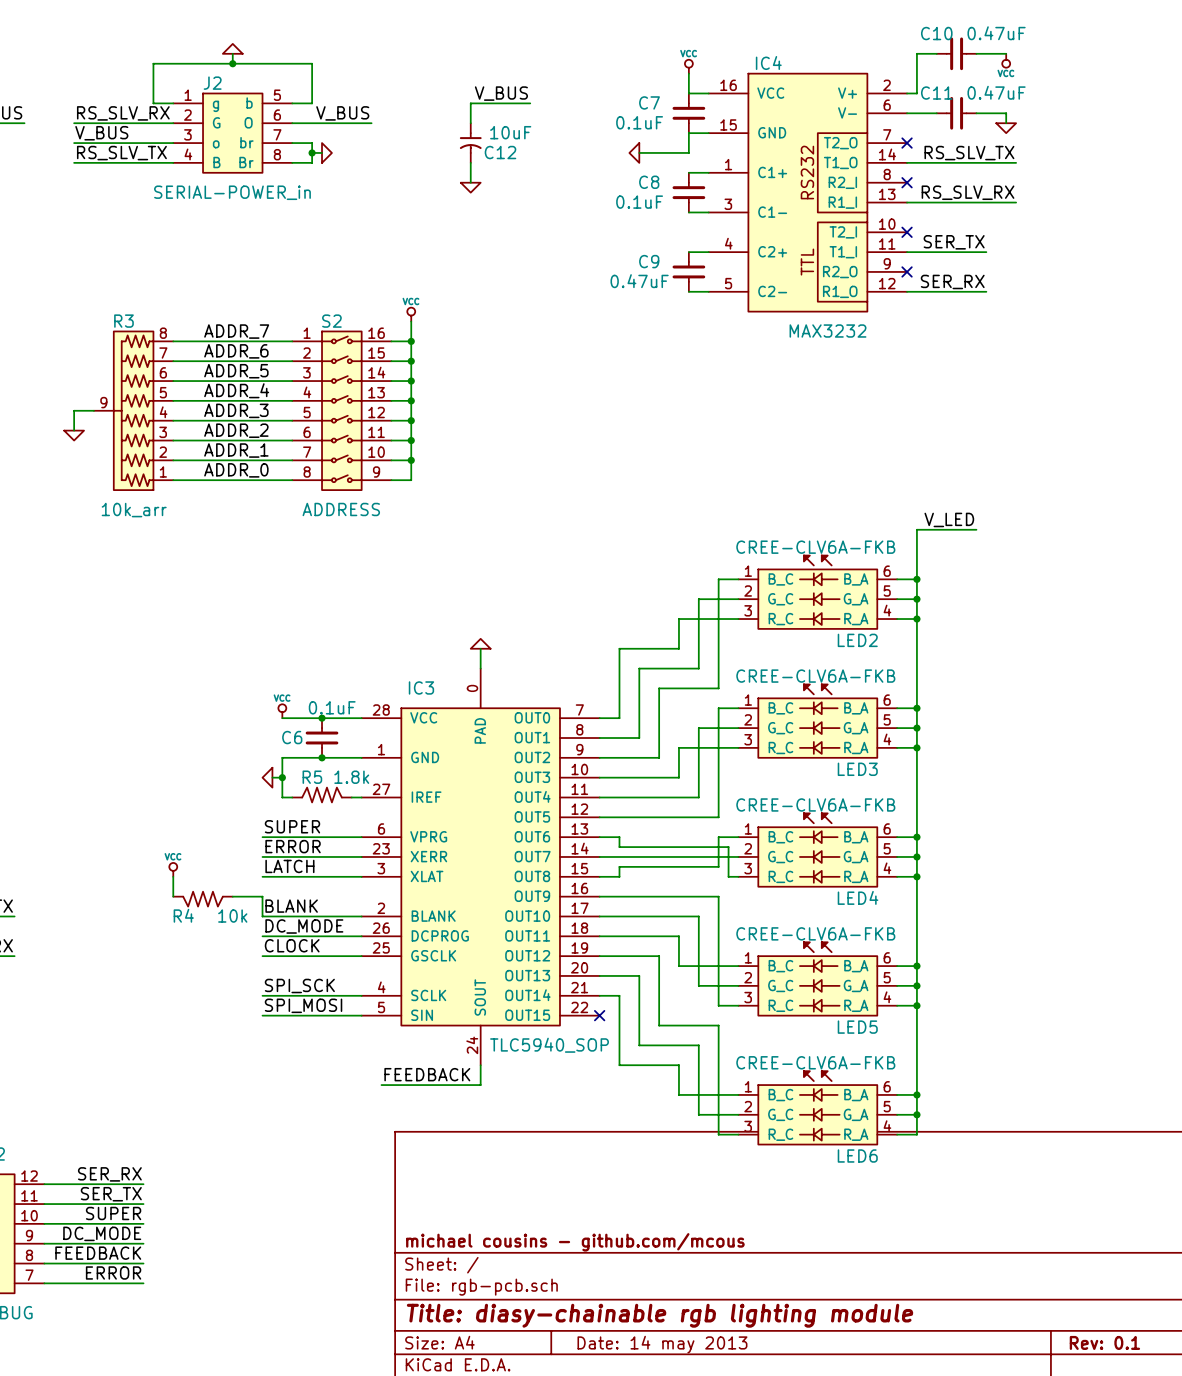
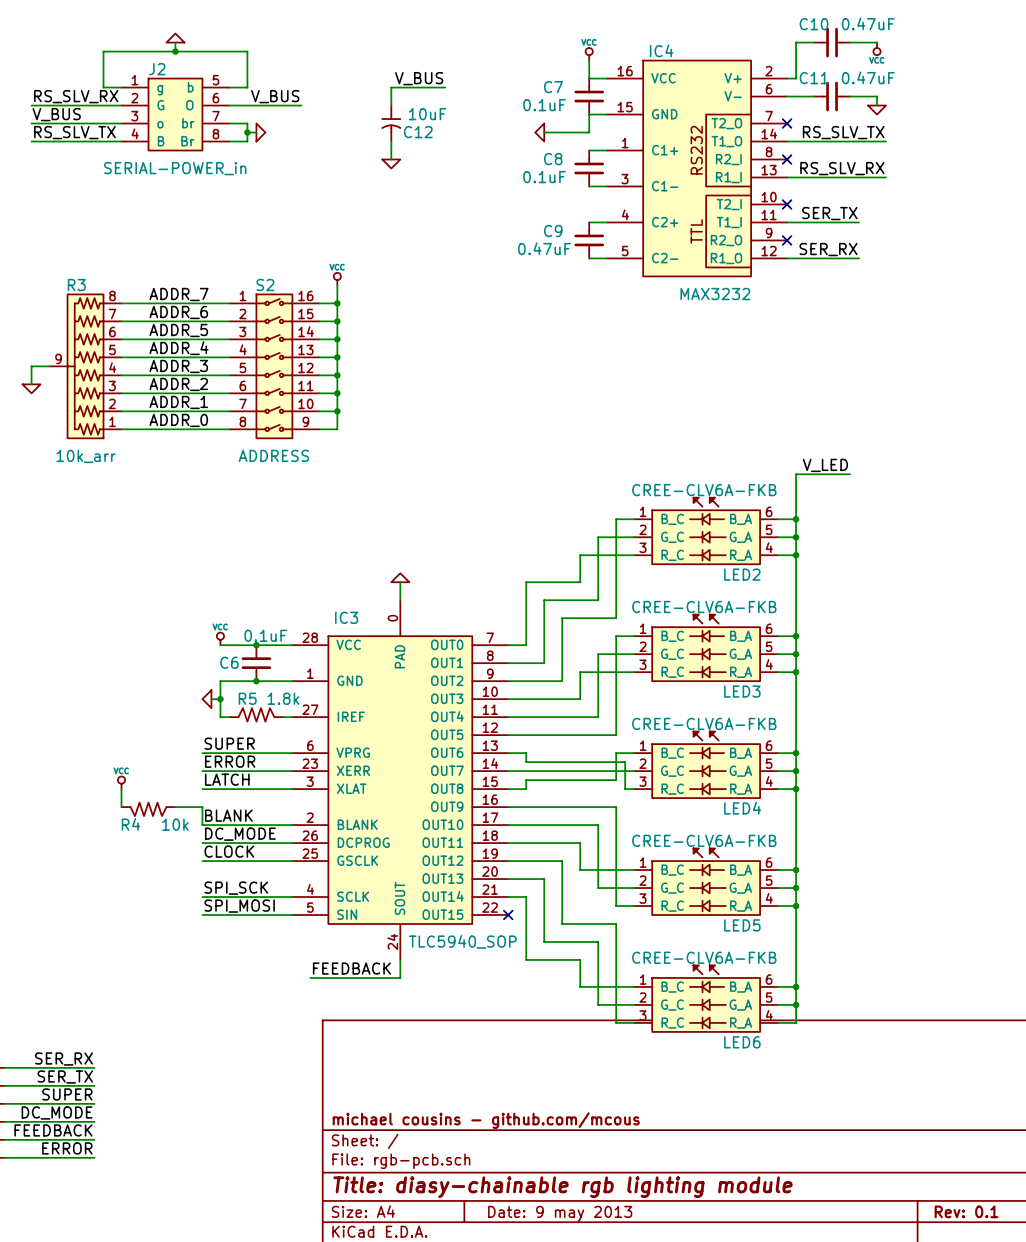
title block: Date: 14 may 2013 (662, 1344) -> Date: 9 may 2013 (560, 1213)

